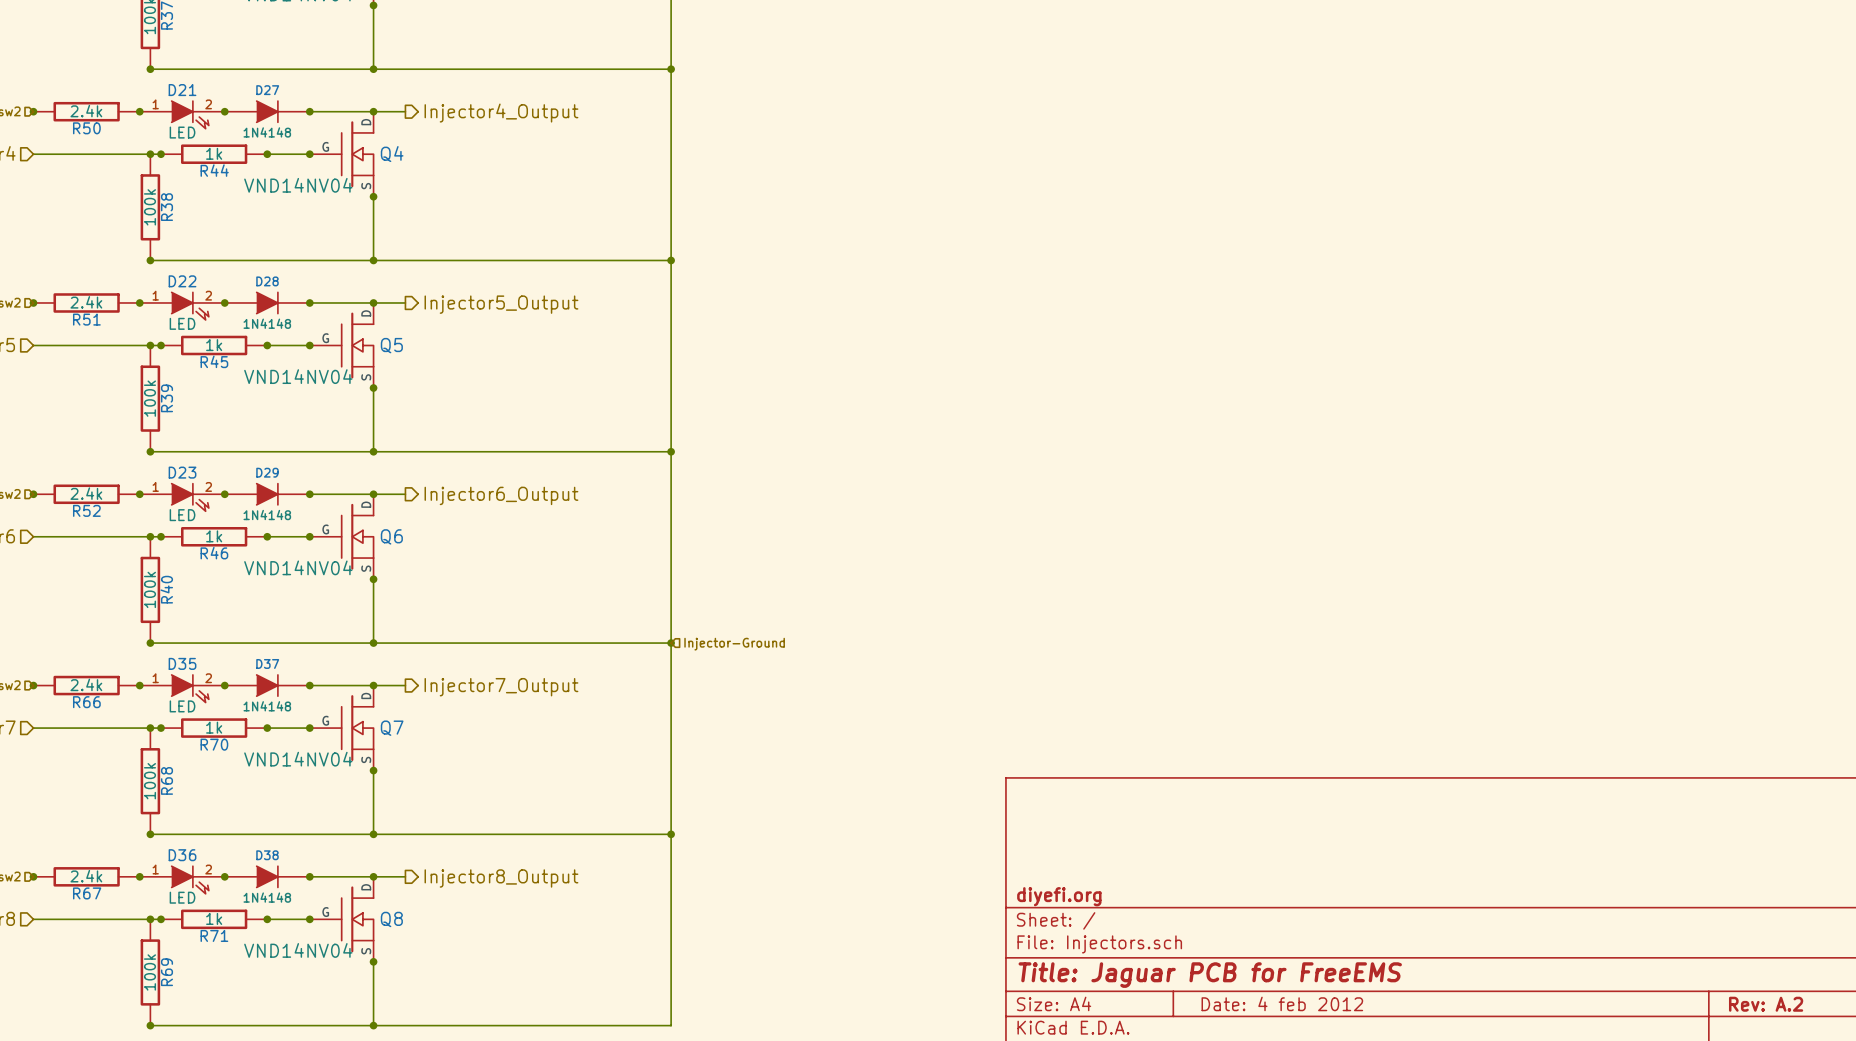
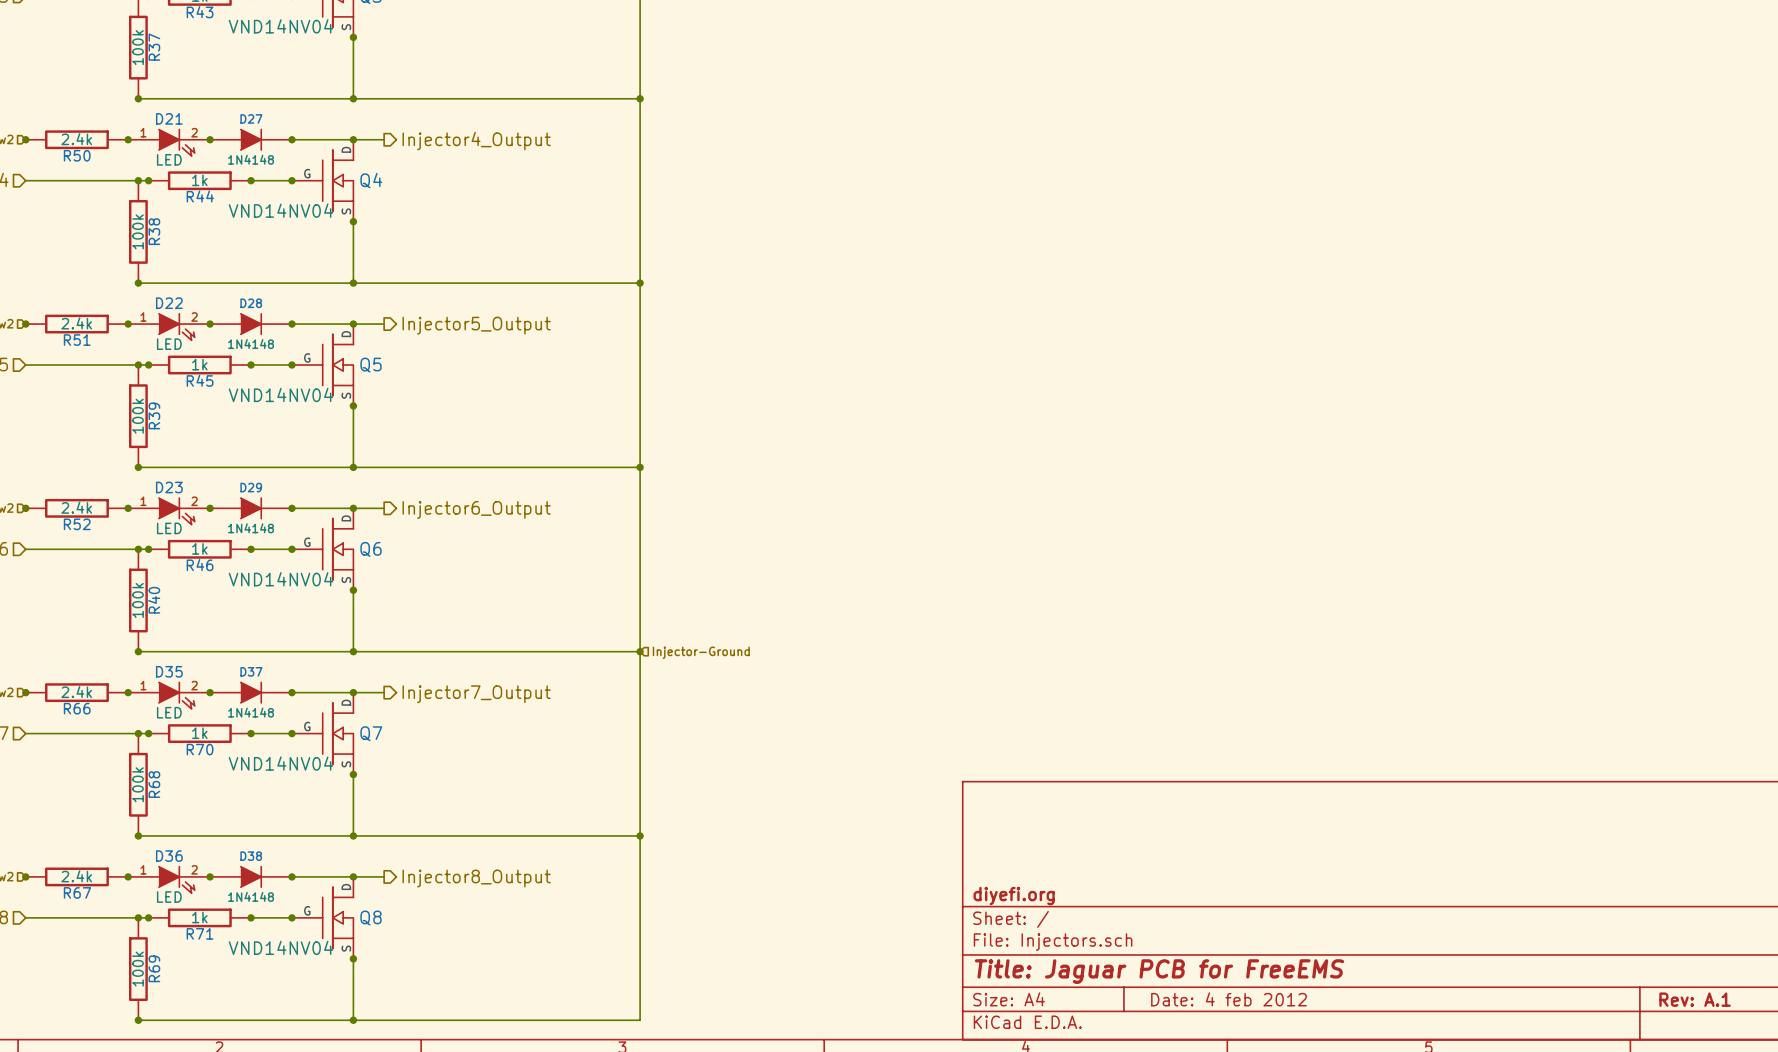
title block: Rev: A.2 (1766, 1004) -> Rev: A.1 (1695, 999)

